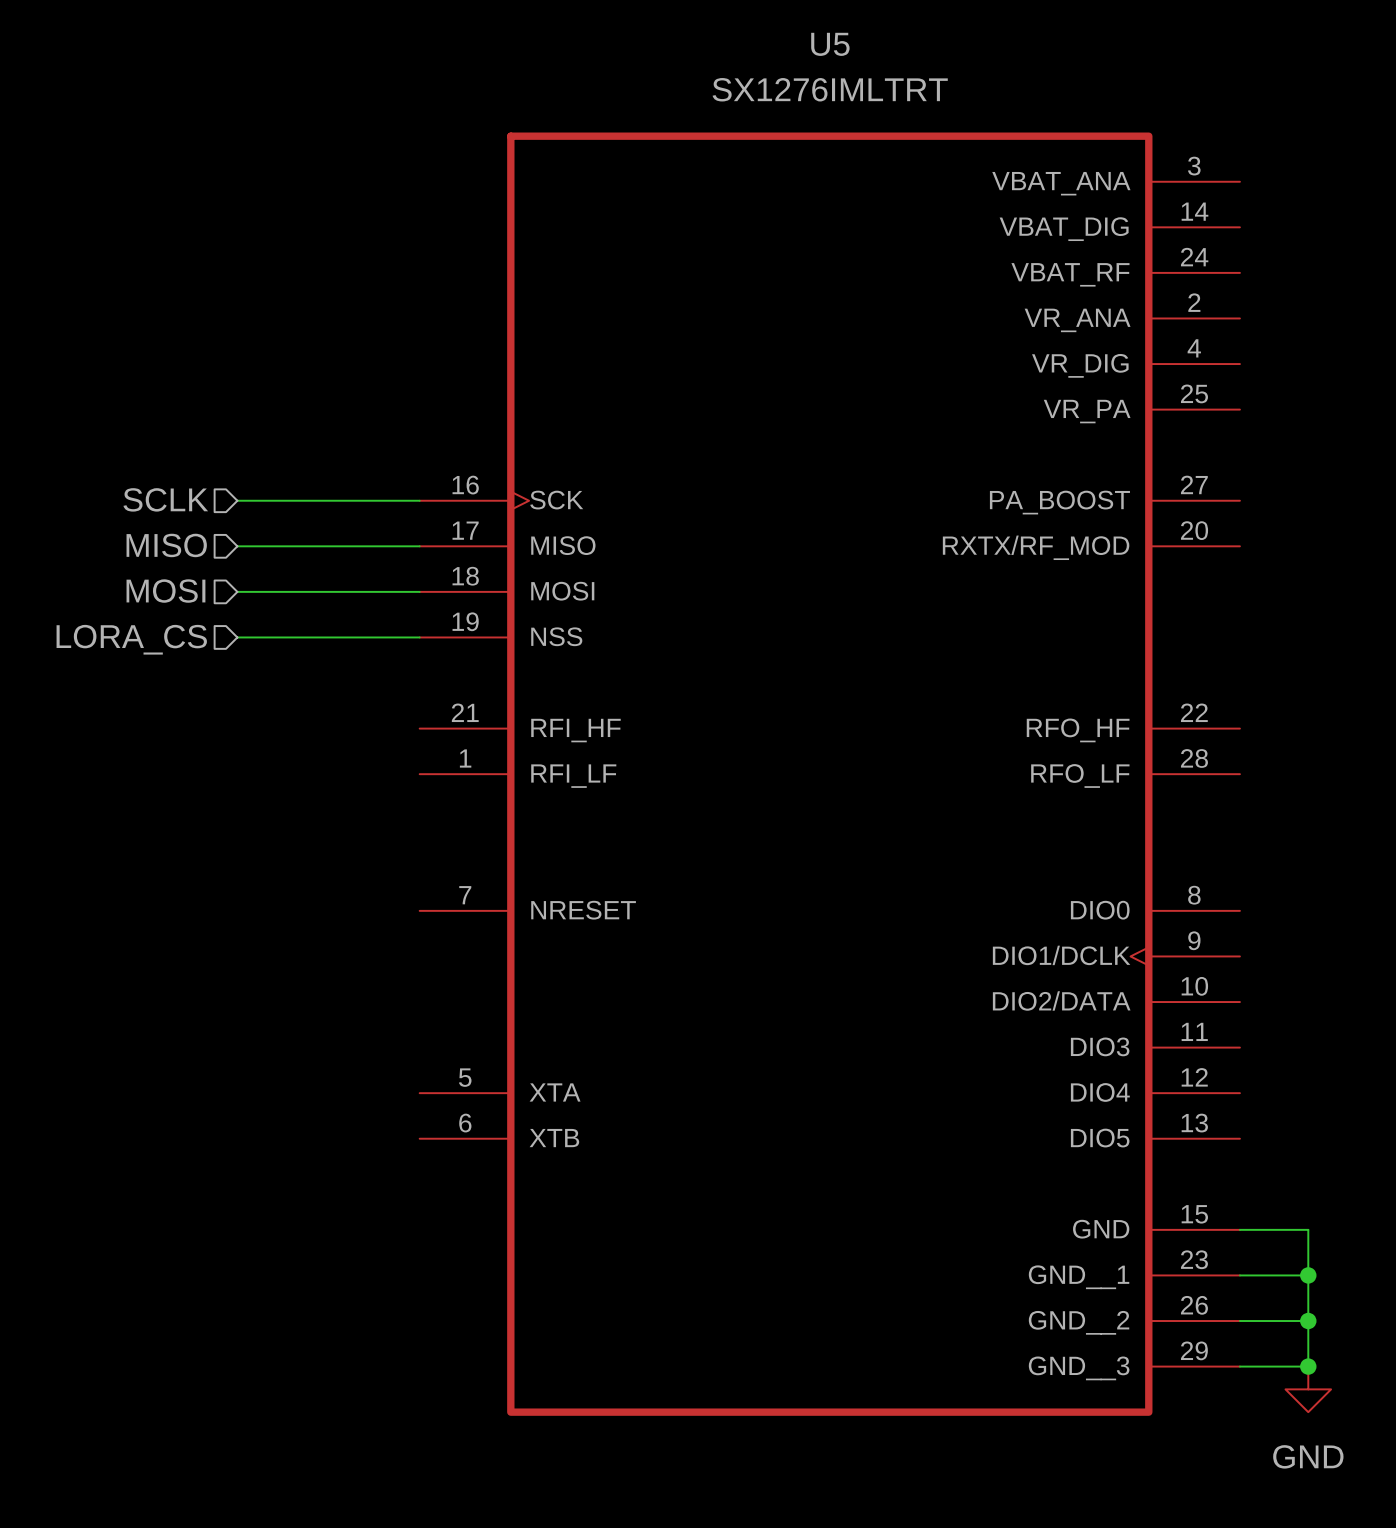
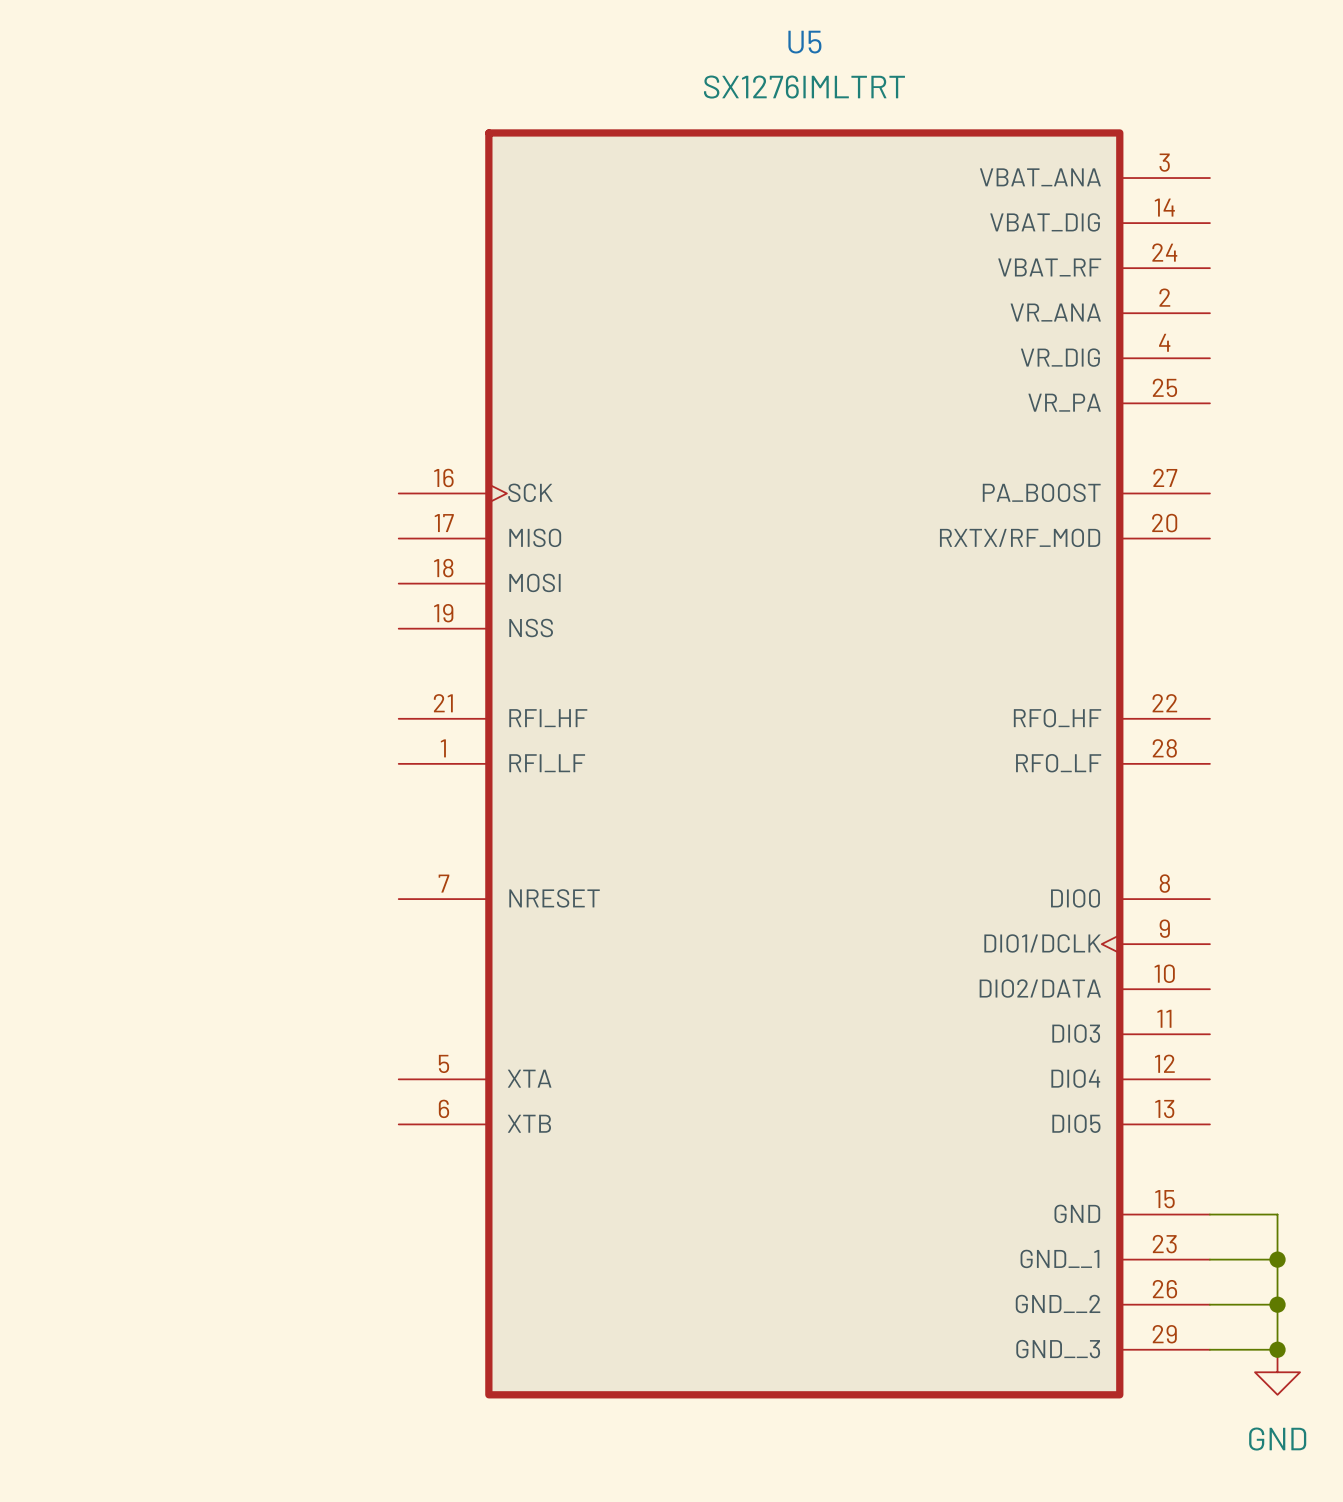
hierarchical label: SCLK (165, 499) -> none
wire: (237, 500) (419, 500) -> none
hierarchical label: MISO (166, 545) -> none
wire: (237, 546) (419, 546) -> none
hierarchical label: MOSI (165, 591) -> none
wire: (237, 591) (419, 591) -> none
wire: (237, 637) (419, 637) -> none
hierarchical label: LORA_CS (131, 639) -> none

